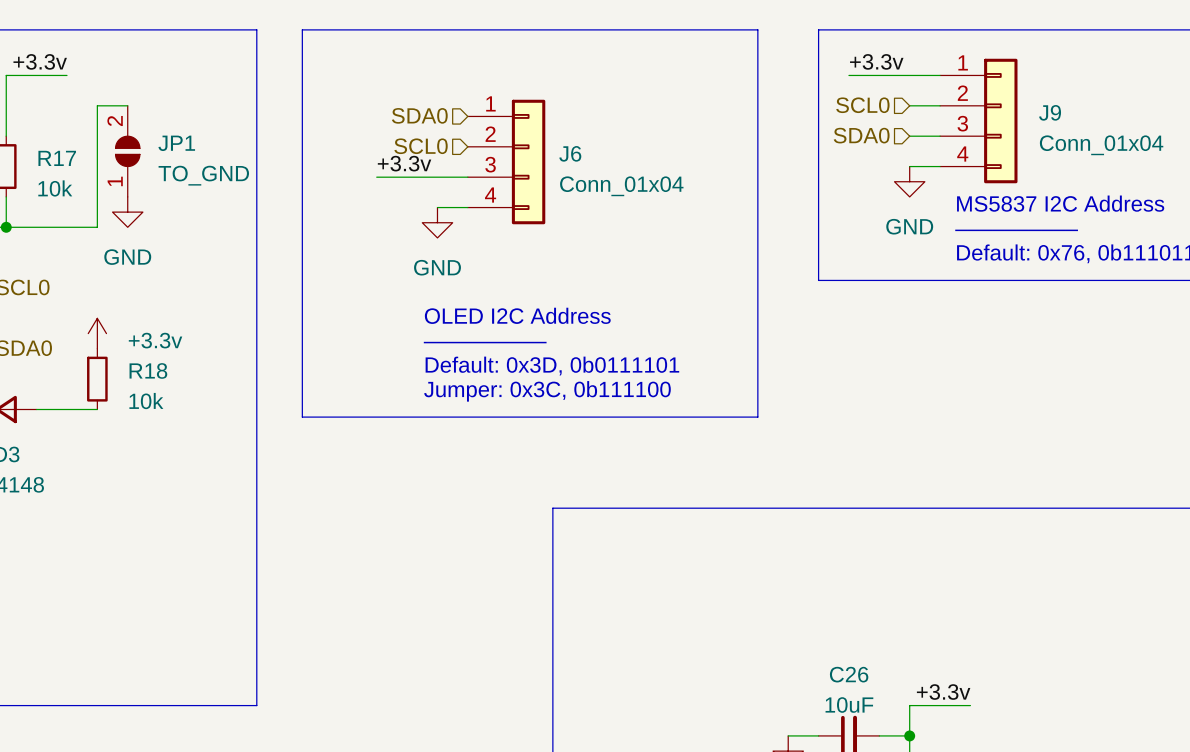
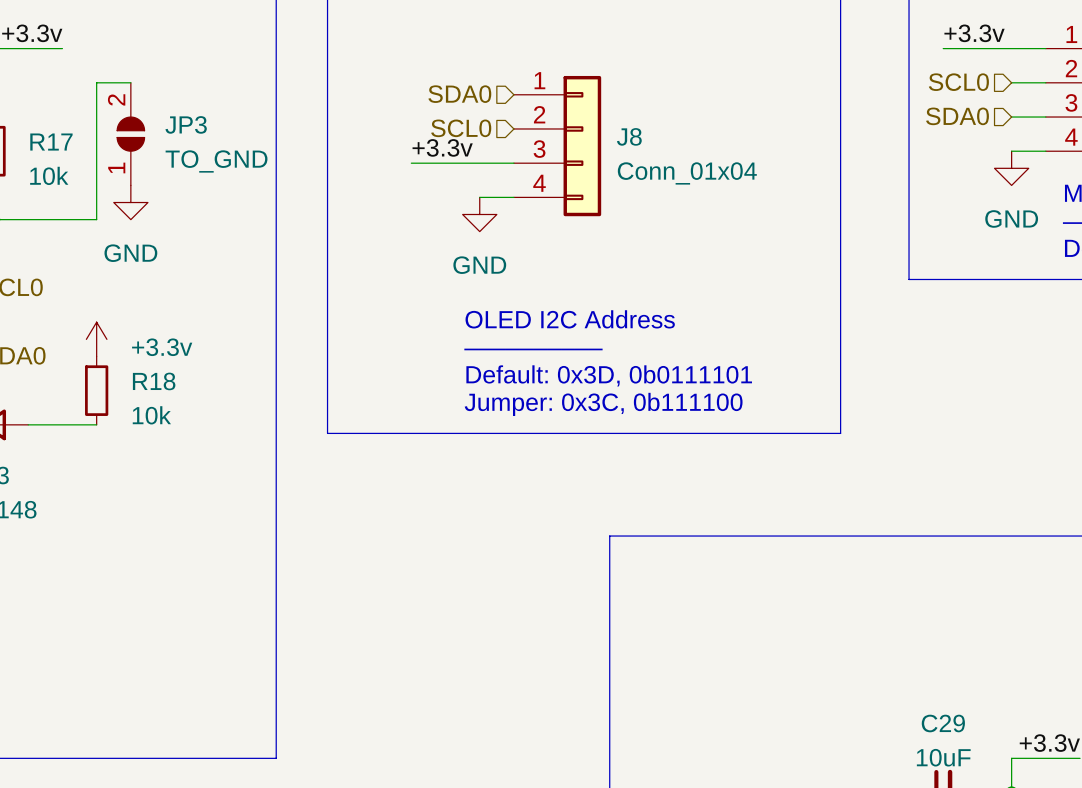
JP1 name: JP1 (176, 143) -> JP3 (186, 124)
J6 name: J6 (570, 153) -> J8 (629, 136)
C26 name: C26 (849, 674) -> C29 (943, 723)

